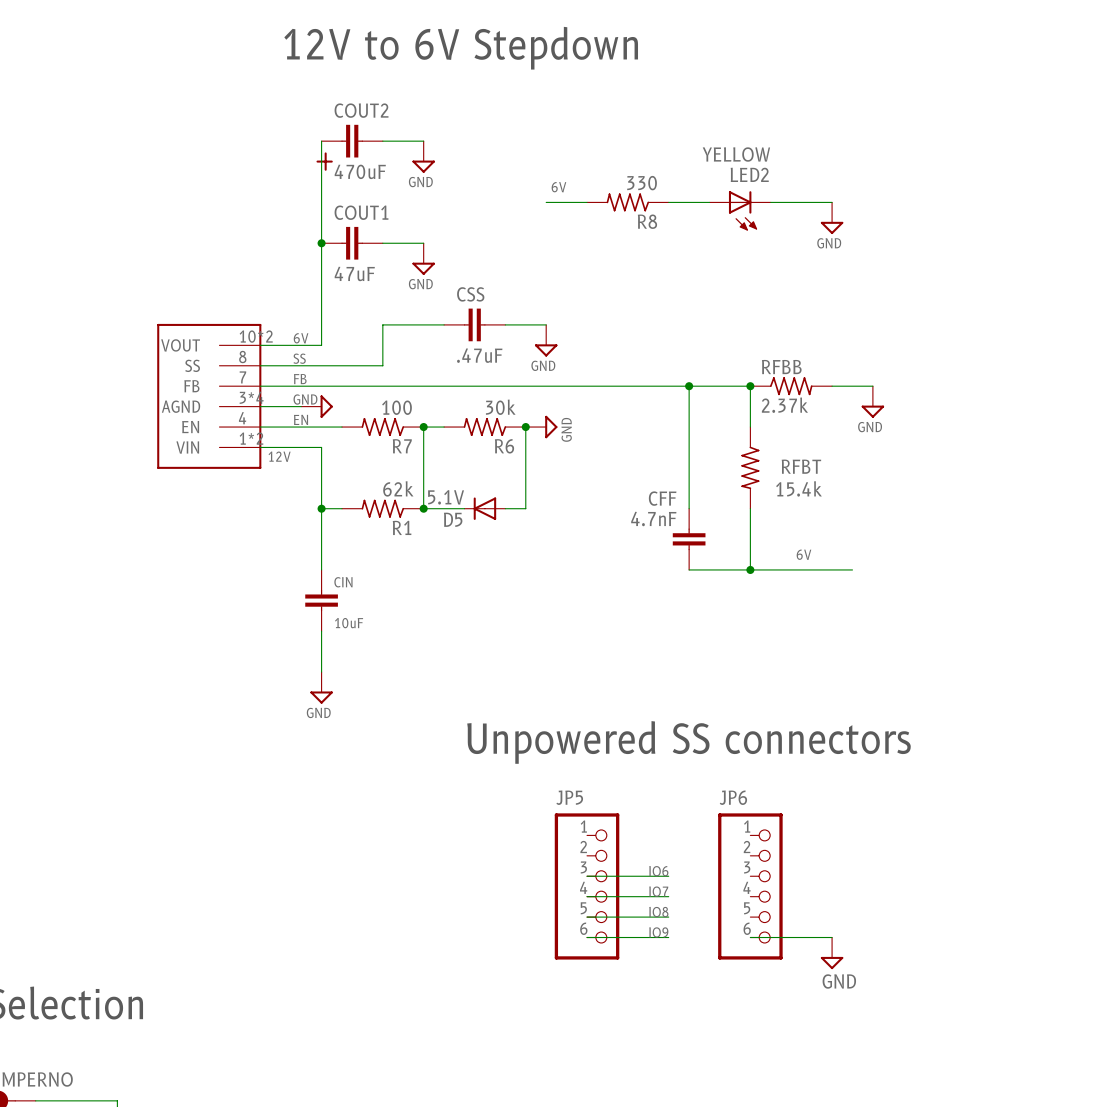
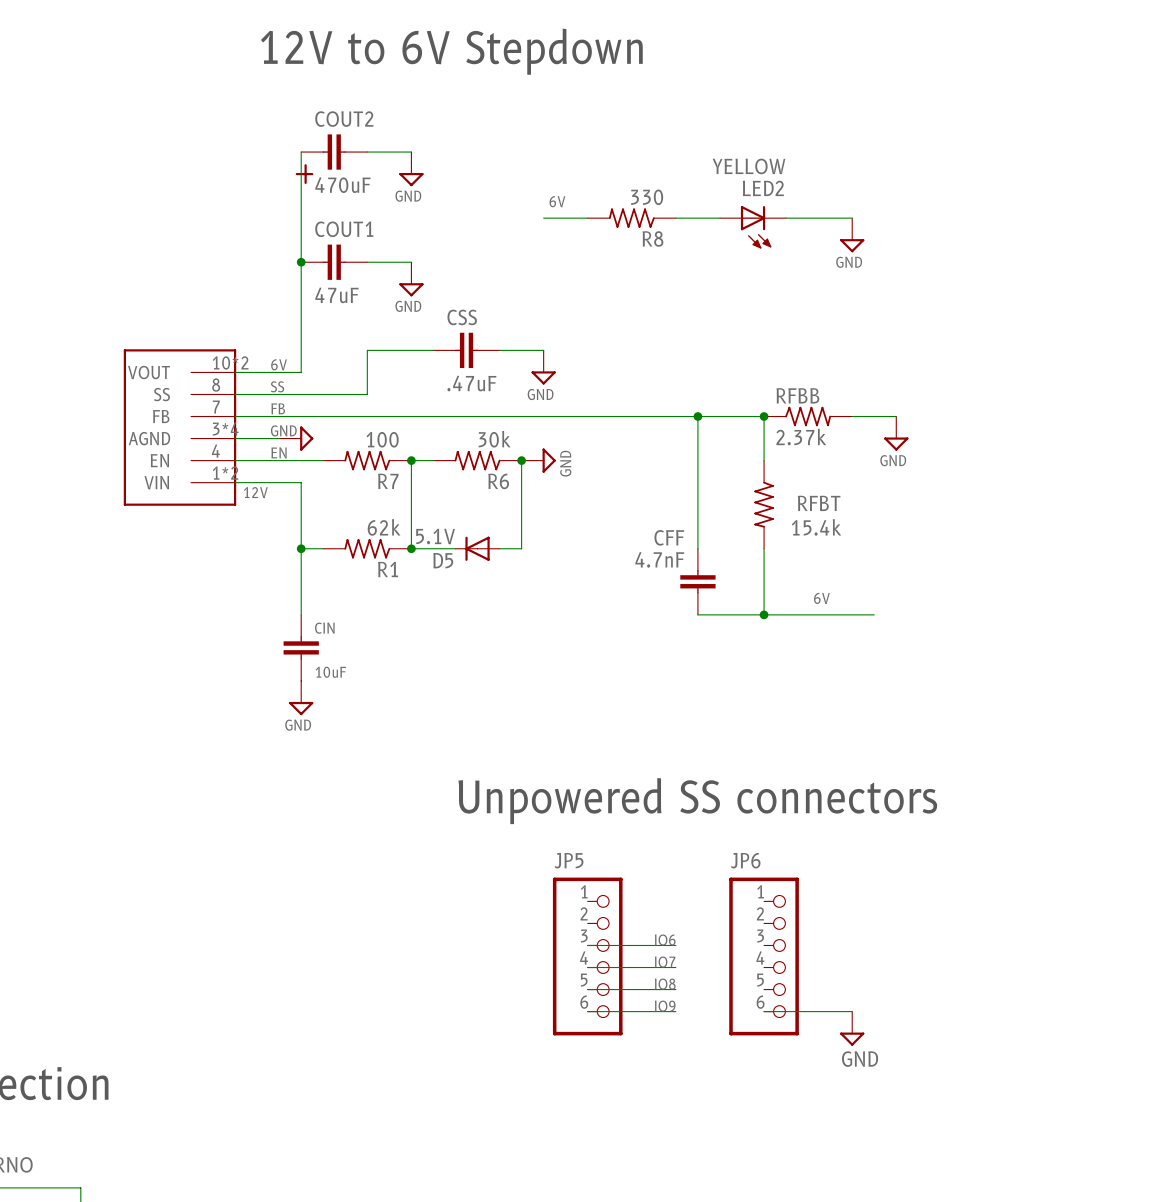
power symbol position: GND (321, 687) -> GND (301, 698)

